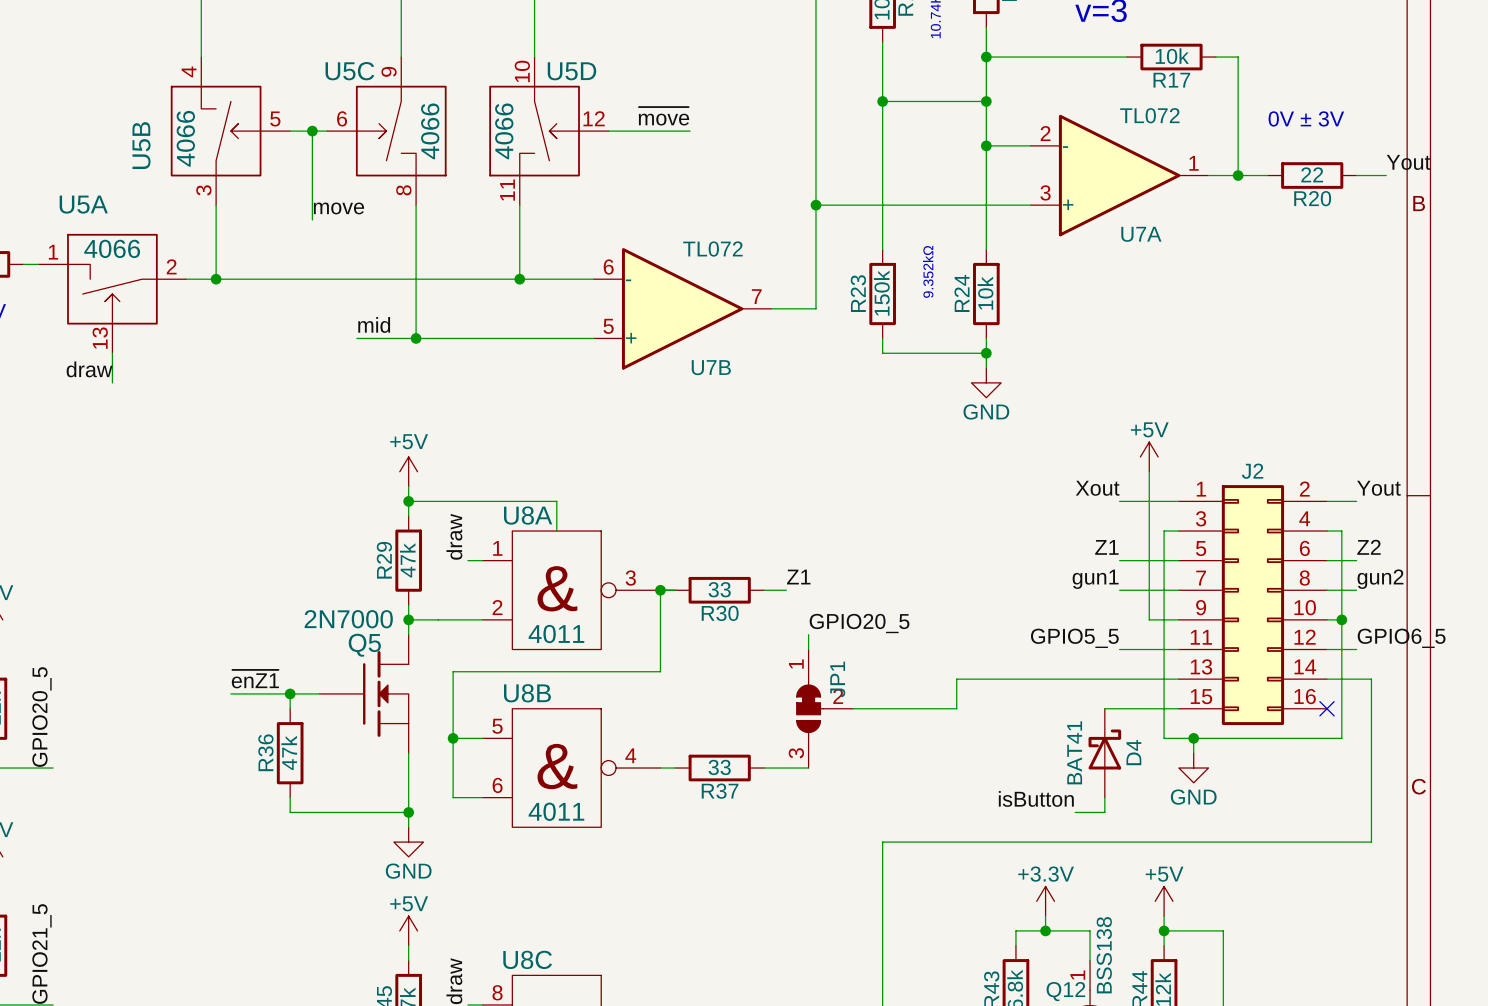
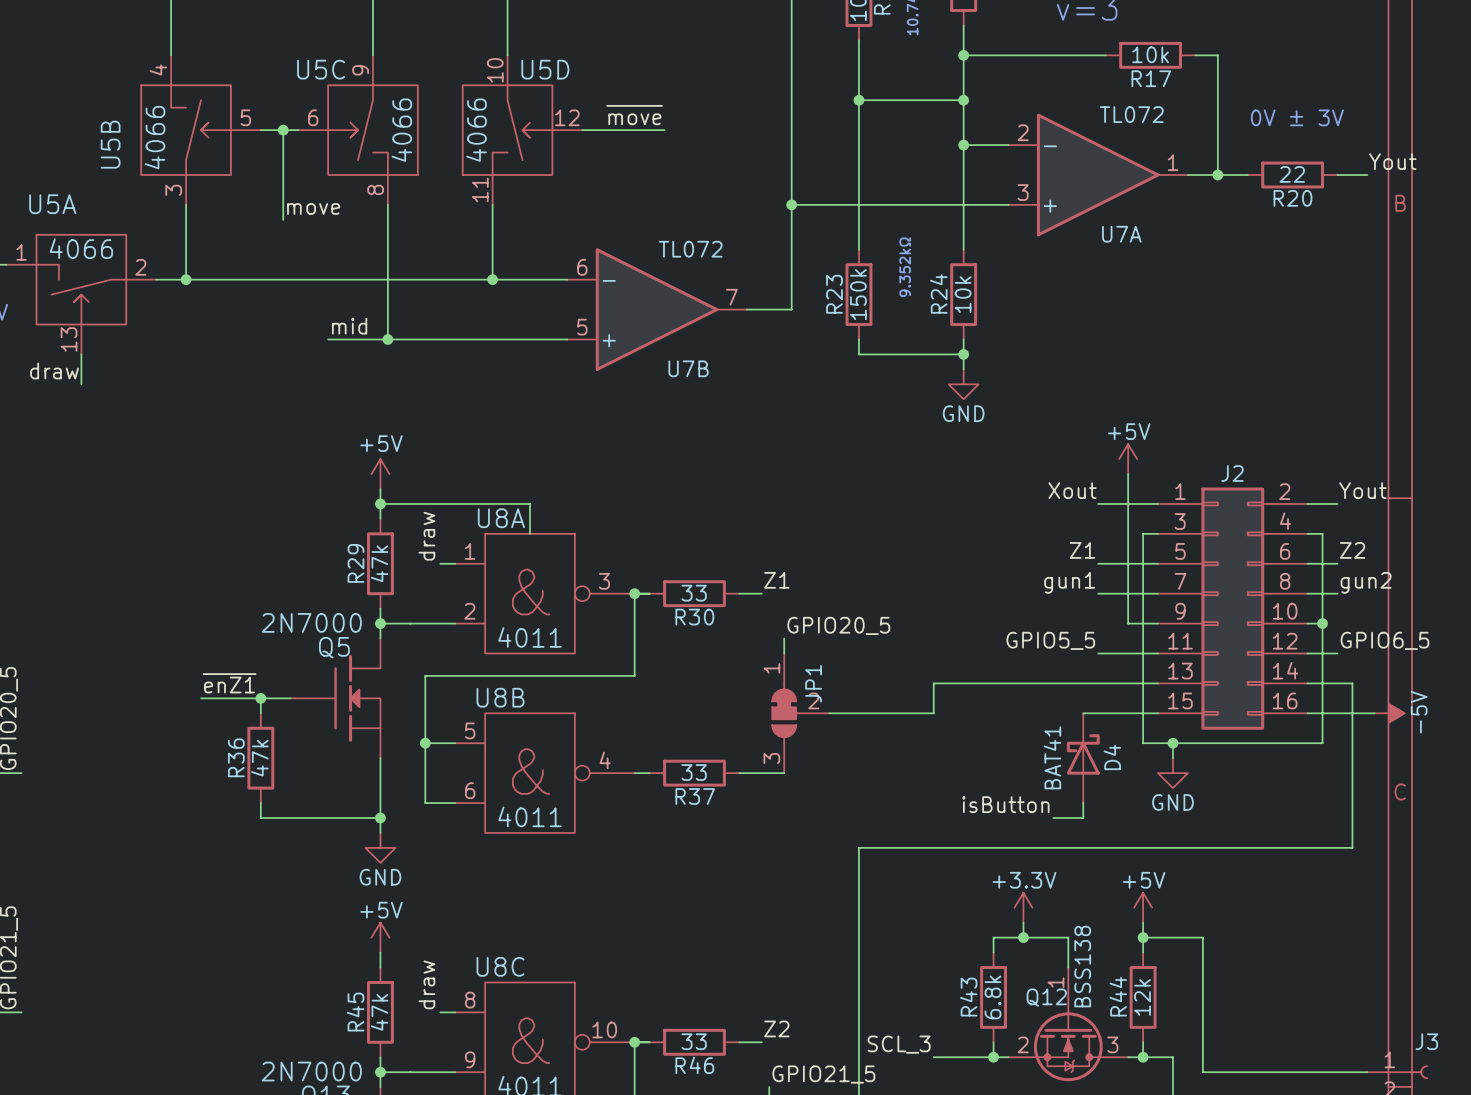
wire: none -> (1307, 713) (1374, 713)
no-connect mark: (1327, 708) -> none
power symbol: none -> -5V (1389, 713)

